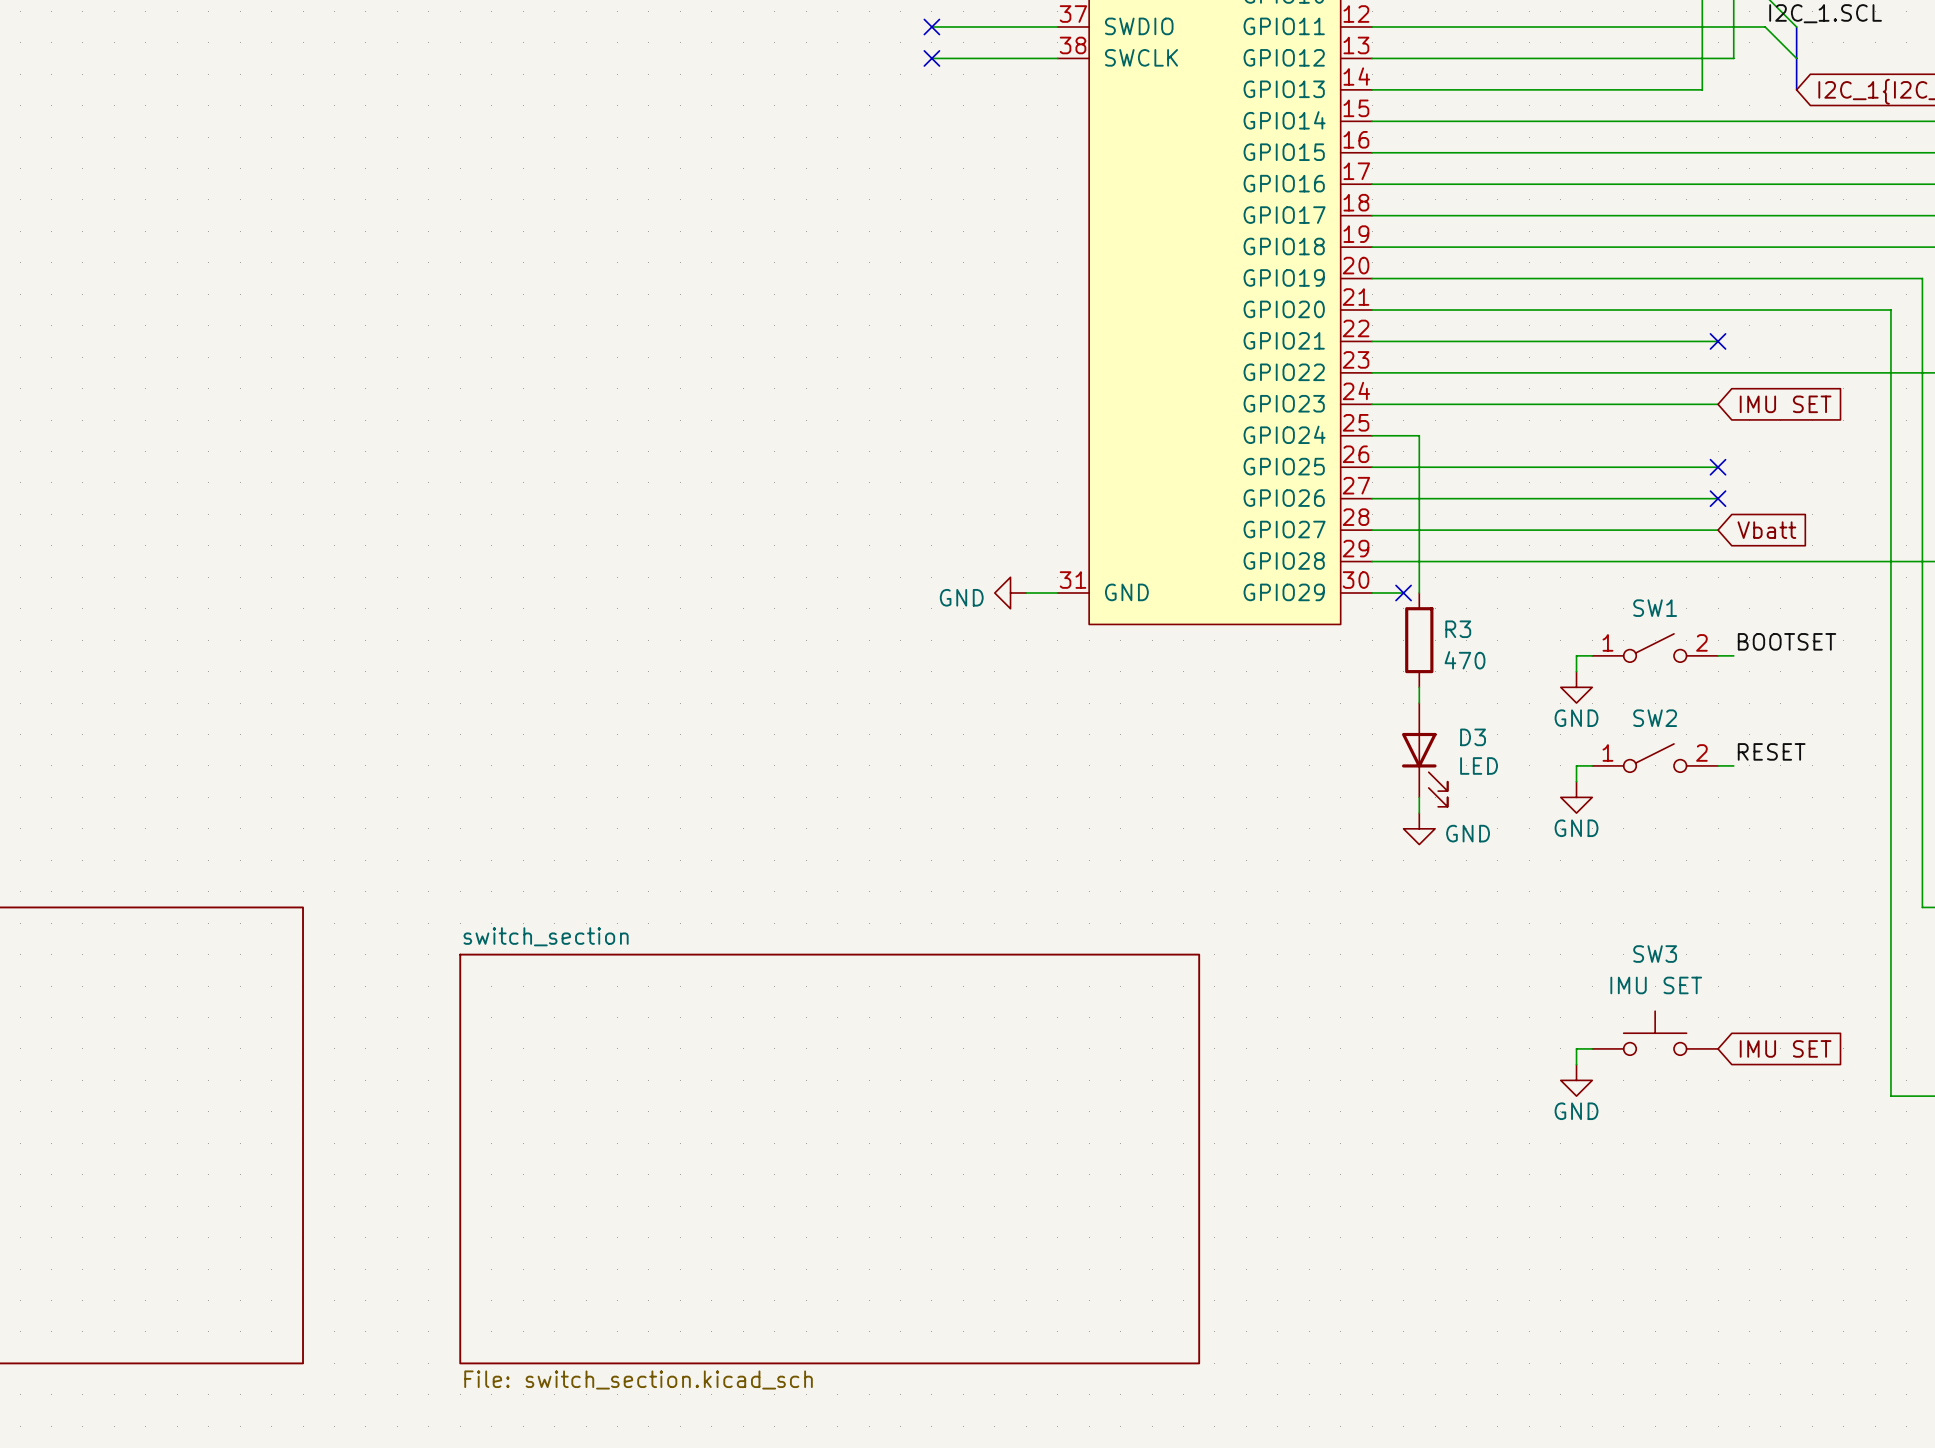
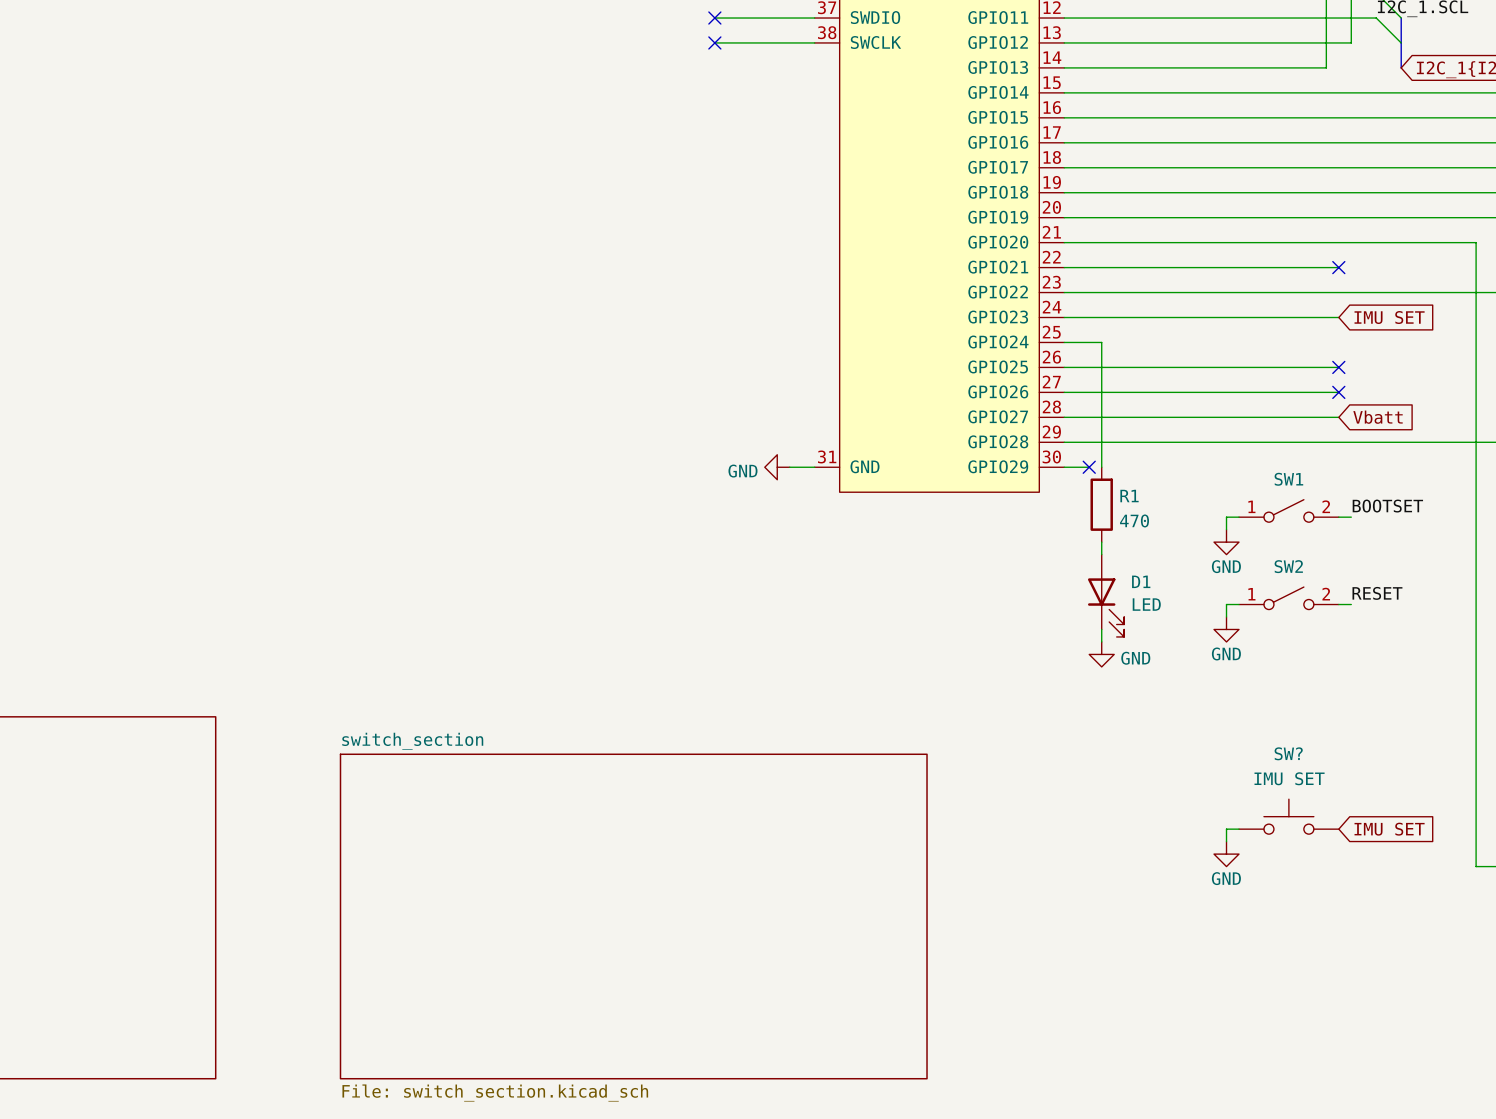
R3 name: R3 (1458, 629) -> R1 (1129, 496)
D3 name: D3 (1473, 737) -> D1 (1141, 581)
SW3 name: SW3 (1655, 954) -> SW? (1288, 753)

